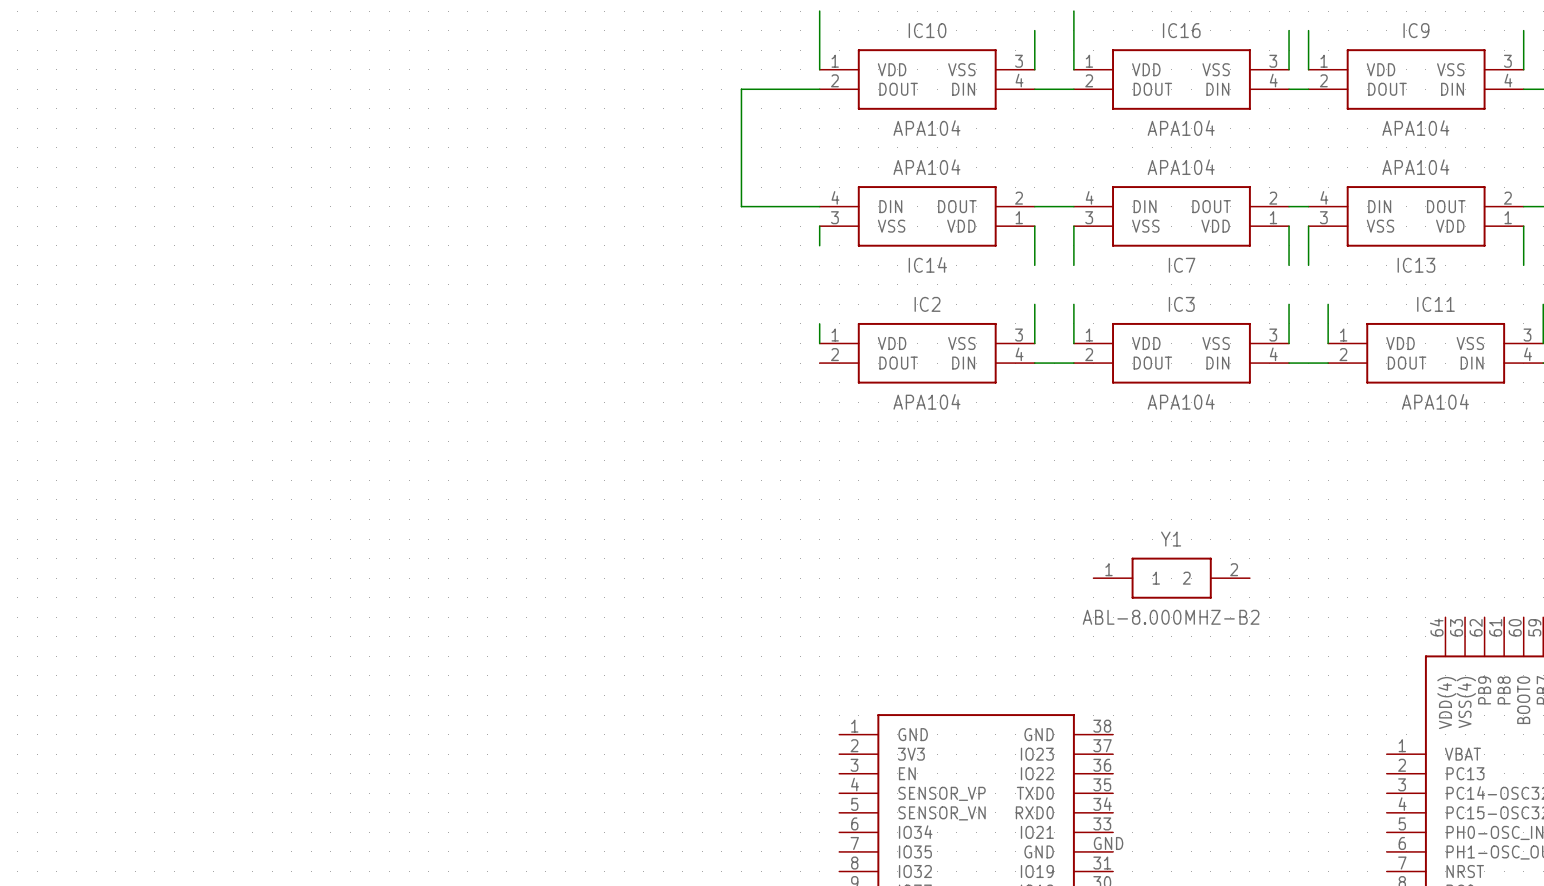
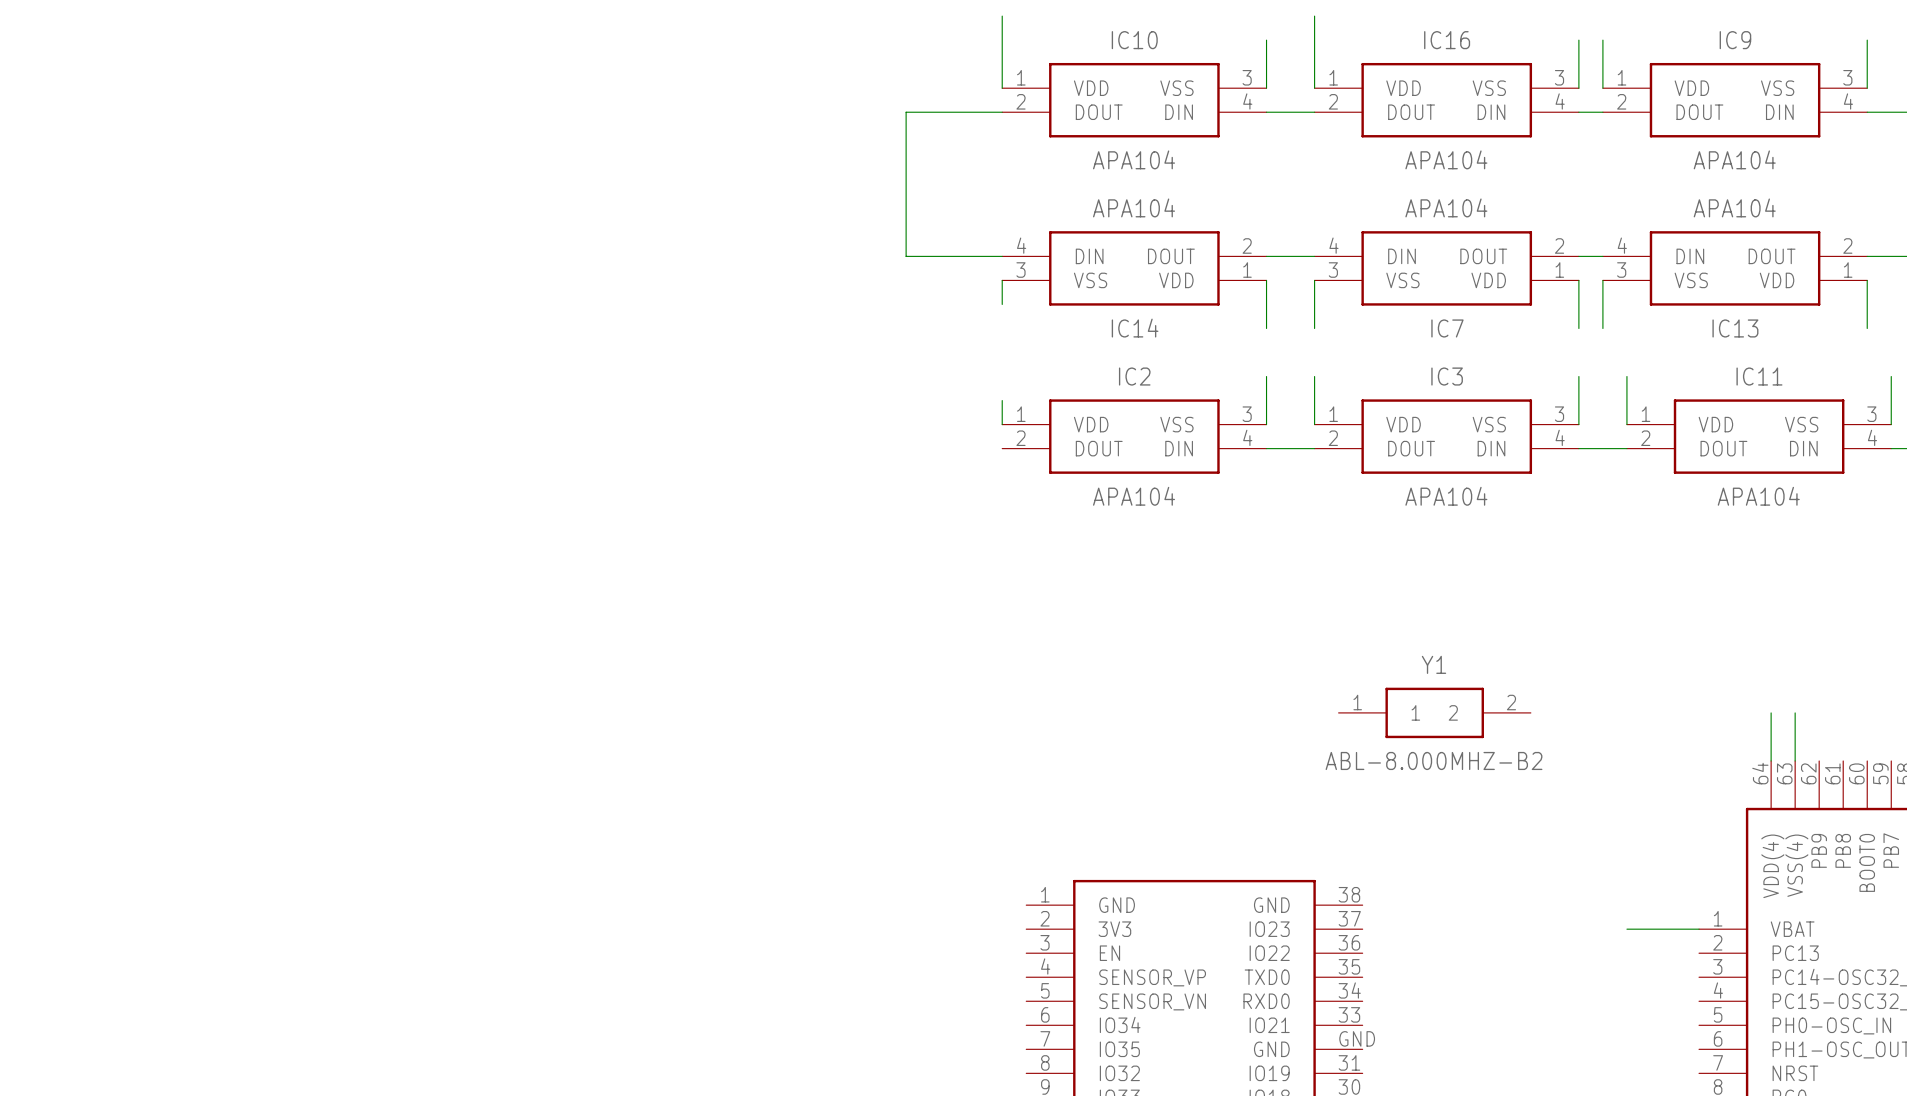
wire: none -> (1771, 712) (1771, 760)
wire: none -> (1795, 712) (1795, 760)
wire: none -> (1626, 929) (1699, 929)

